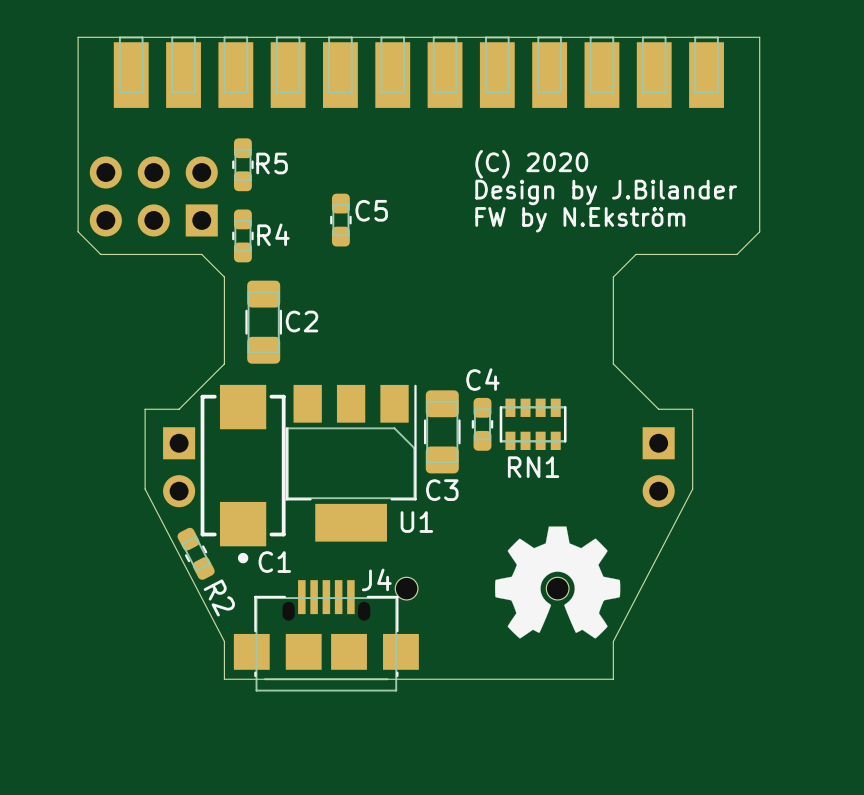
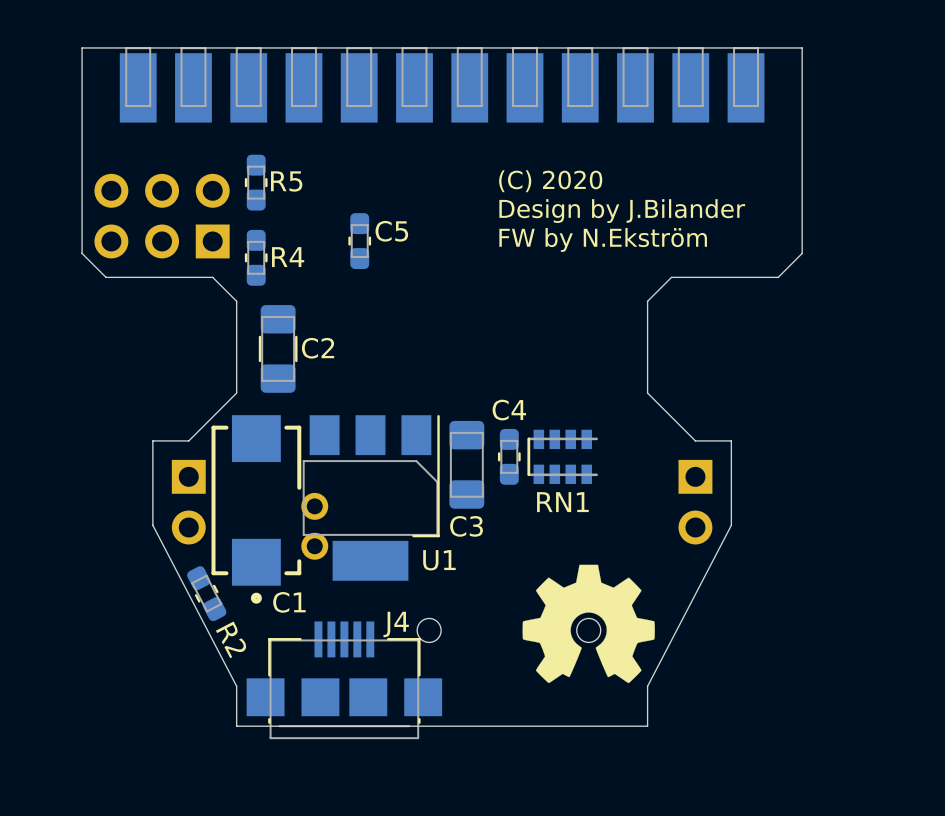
C1 footprint: [200, 384, 286, 564] -> [211, 415, 302, 604]
U1 footprint: [285, 384, 417, 542] -> [302, 415, 440, 581]
C3 footprint: [423, 390, 461, 474] -> [449, 420, 485, 509]
RN1 footprint: [499, 398, 567, 451] -> [527, 429, 598, 484]
part: none -> (314, 526)

